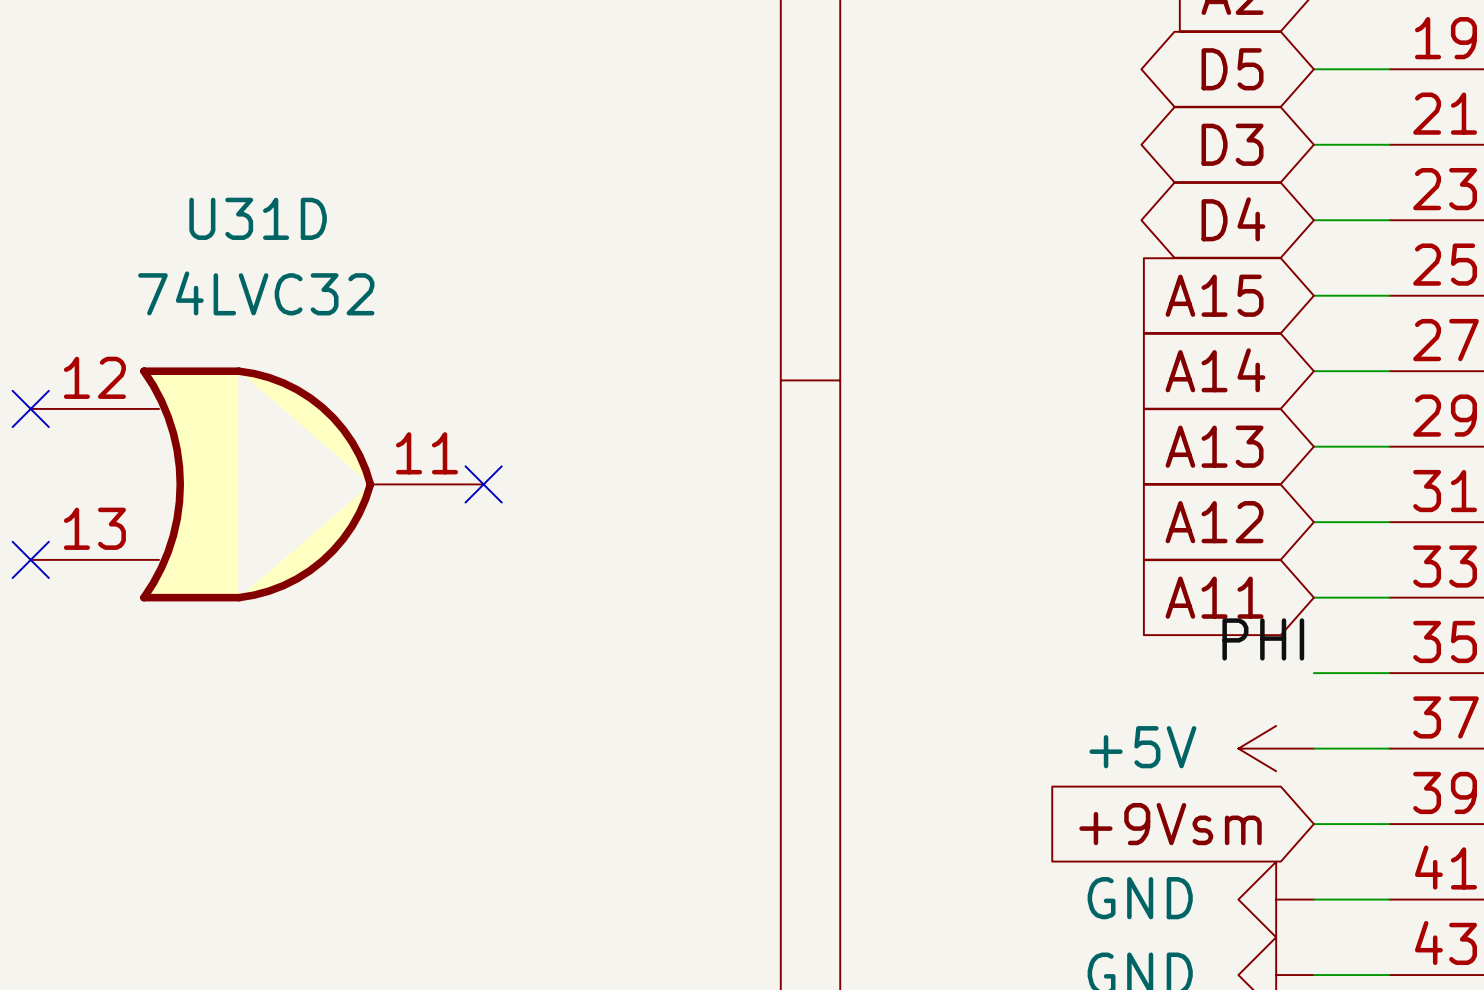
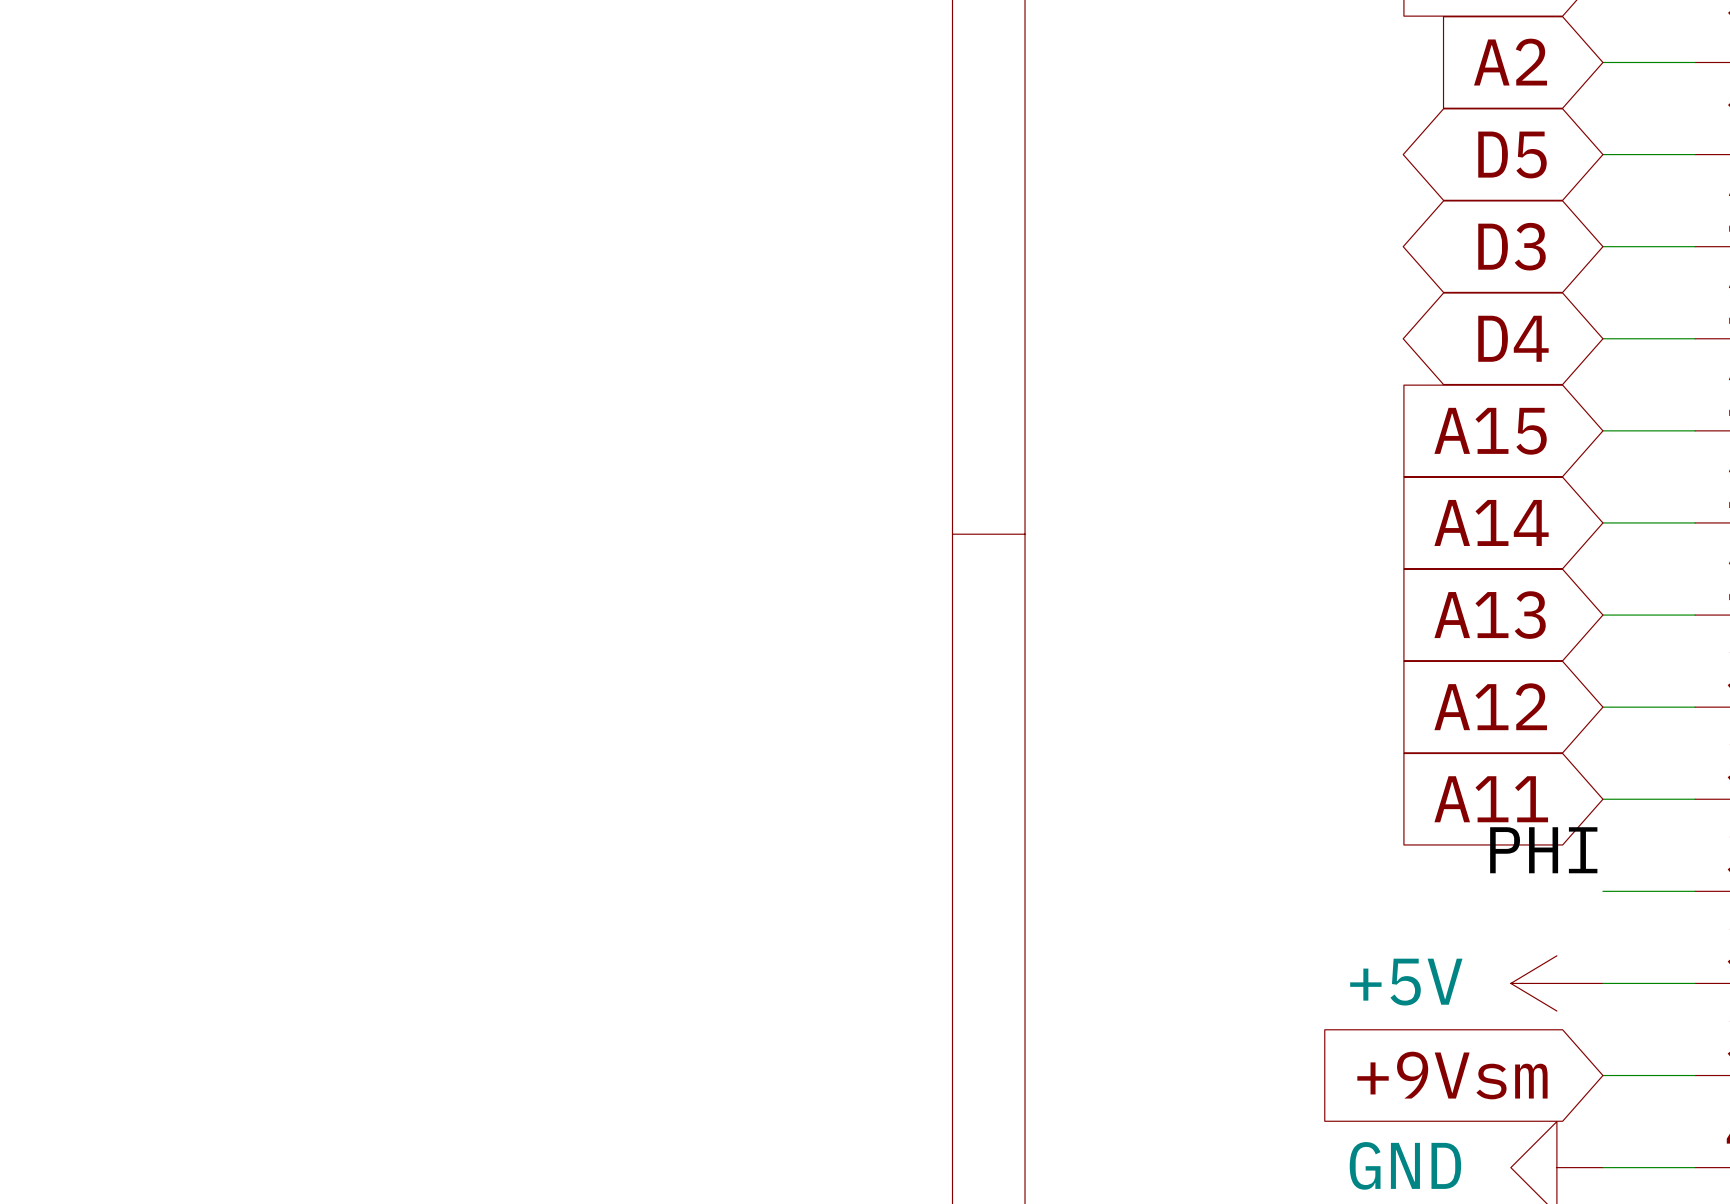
no-connect mark: (30, 408) -> none
U31D: 74LVC32 (257, 484) -> none
no-connect mark: (483, 484) -> none
no-connect mark: (30, 559) -> none

